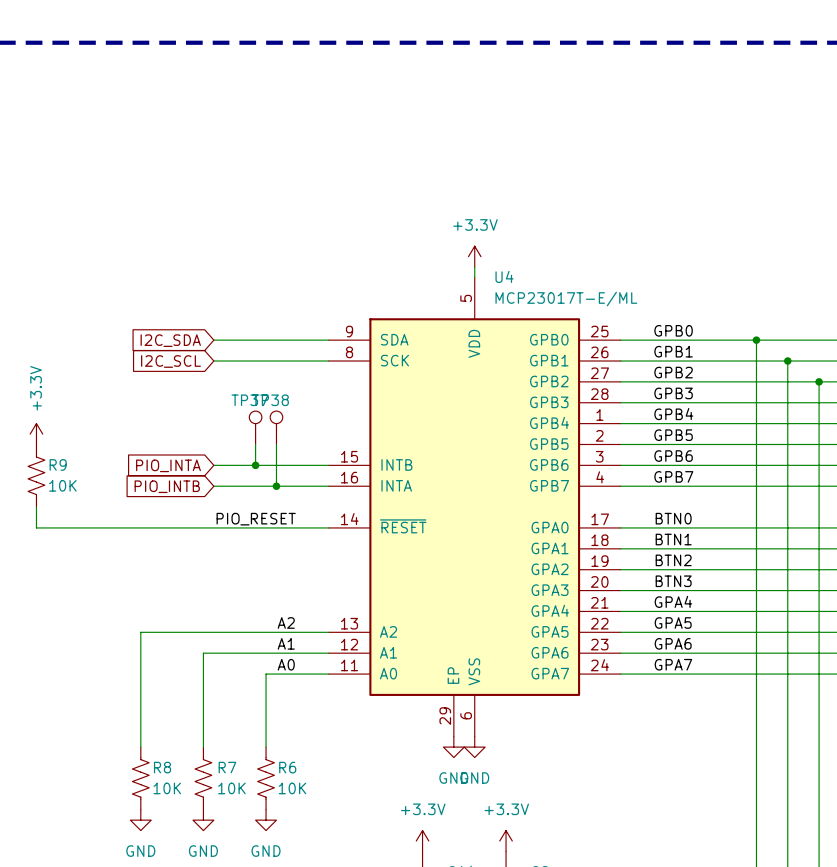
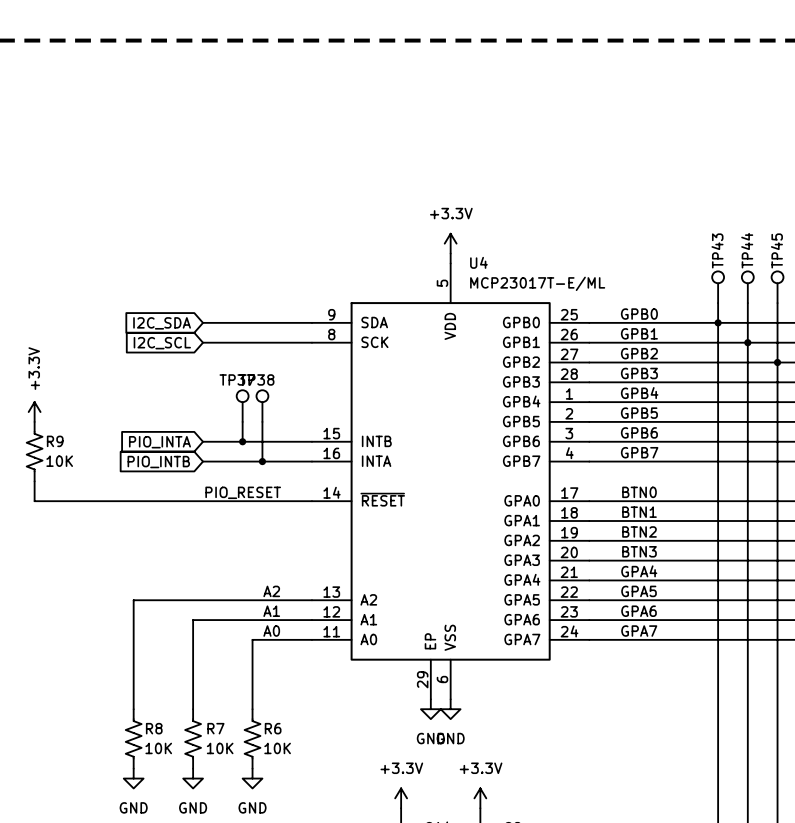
TP43: none -> (718, 287)
TP44: none -> (747, 287)
TP45: none -> (777, 287)
wire: none -> (718, 303) (718, 322)
wire: none -> (747, 303) (747, 342)
wire: none -> (777, 303) (777, 362)

